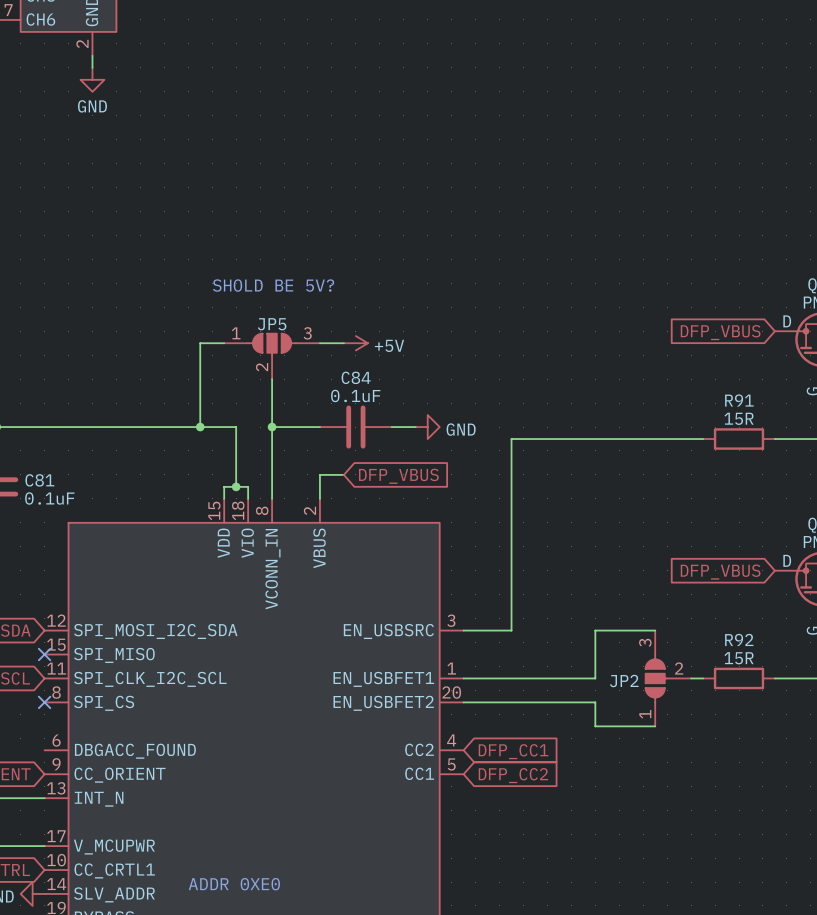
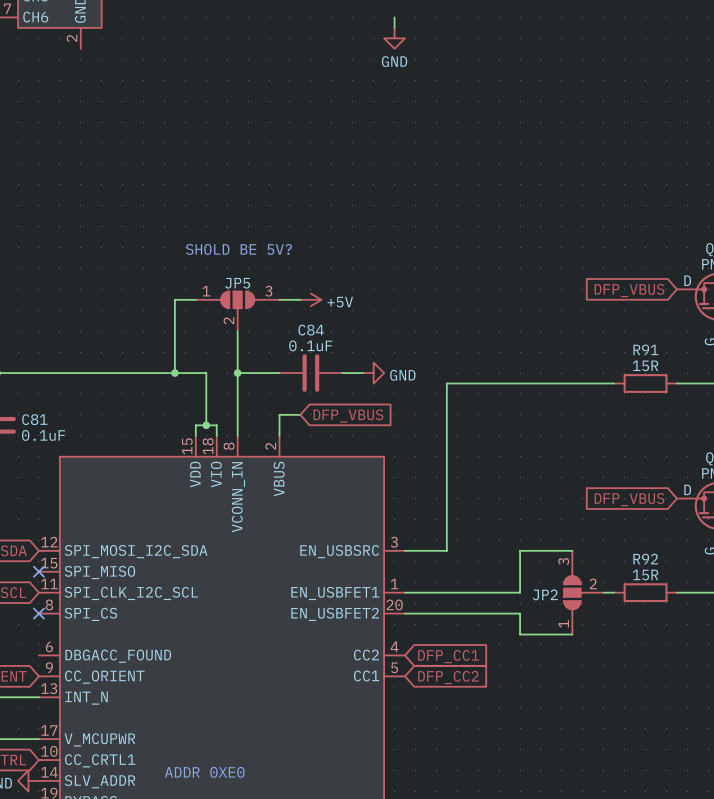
wire: none -> (394, 17) (394, 27)
power symbol: none -> GND (394, 38)
wire: (92, 55) (92, 67) -> none
power symbol: GND (92, 79) -> none

